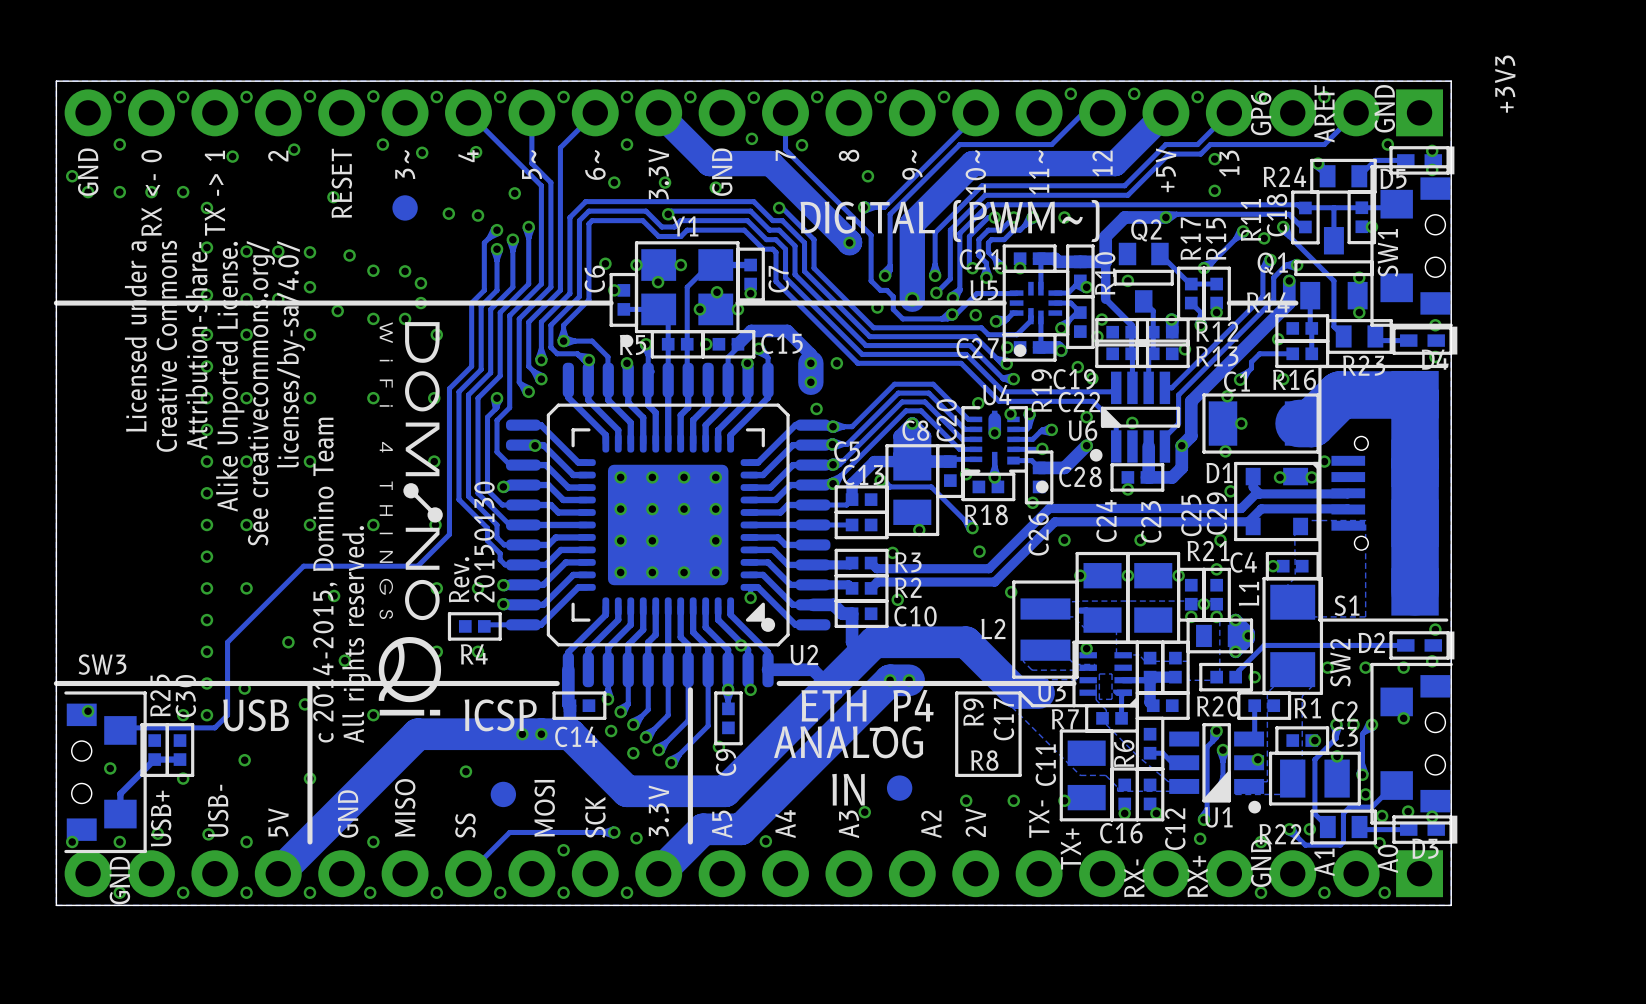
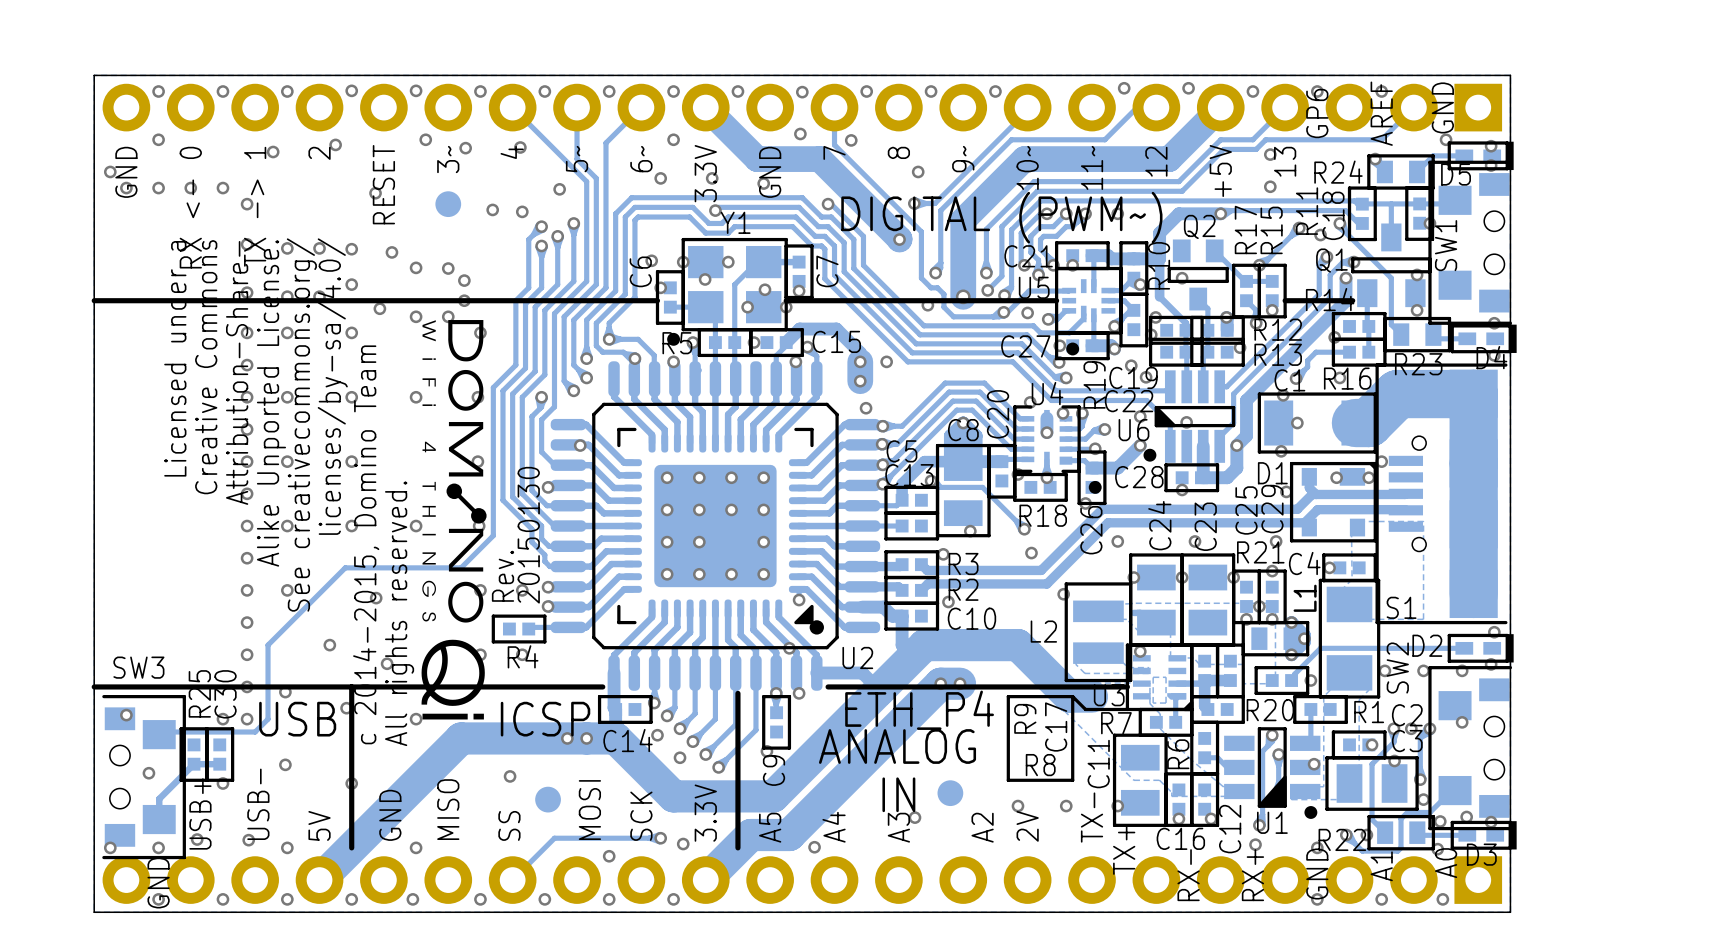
text: +3V3 (1505, 84) -> none

